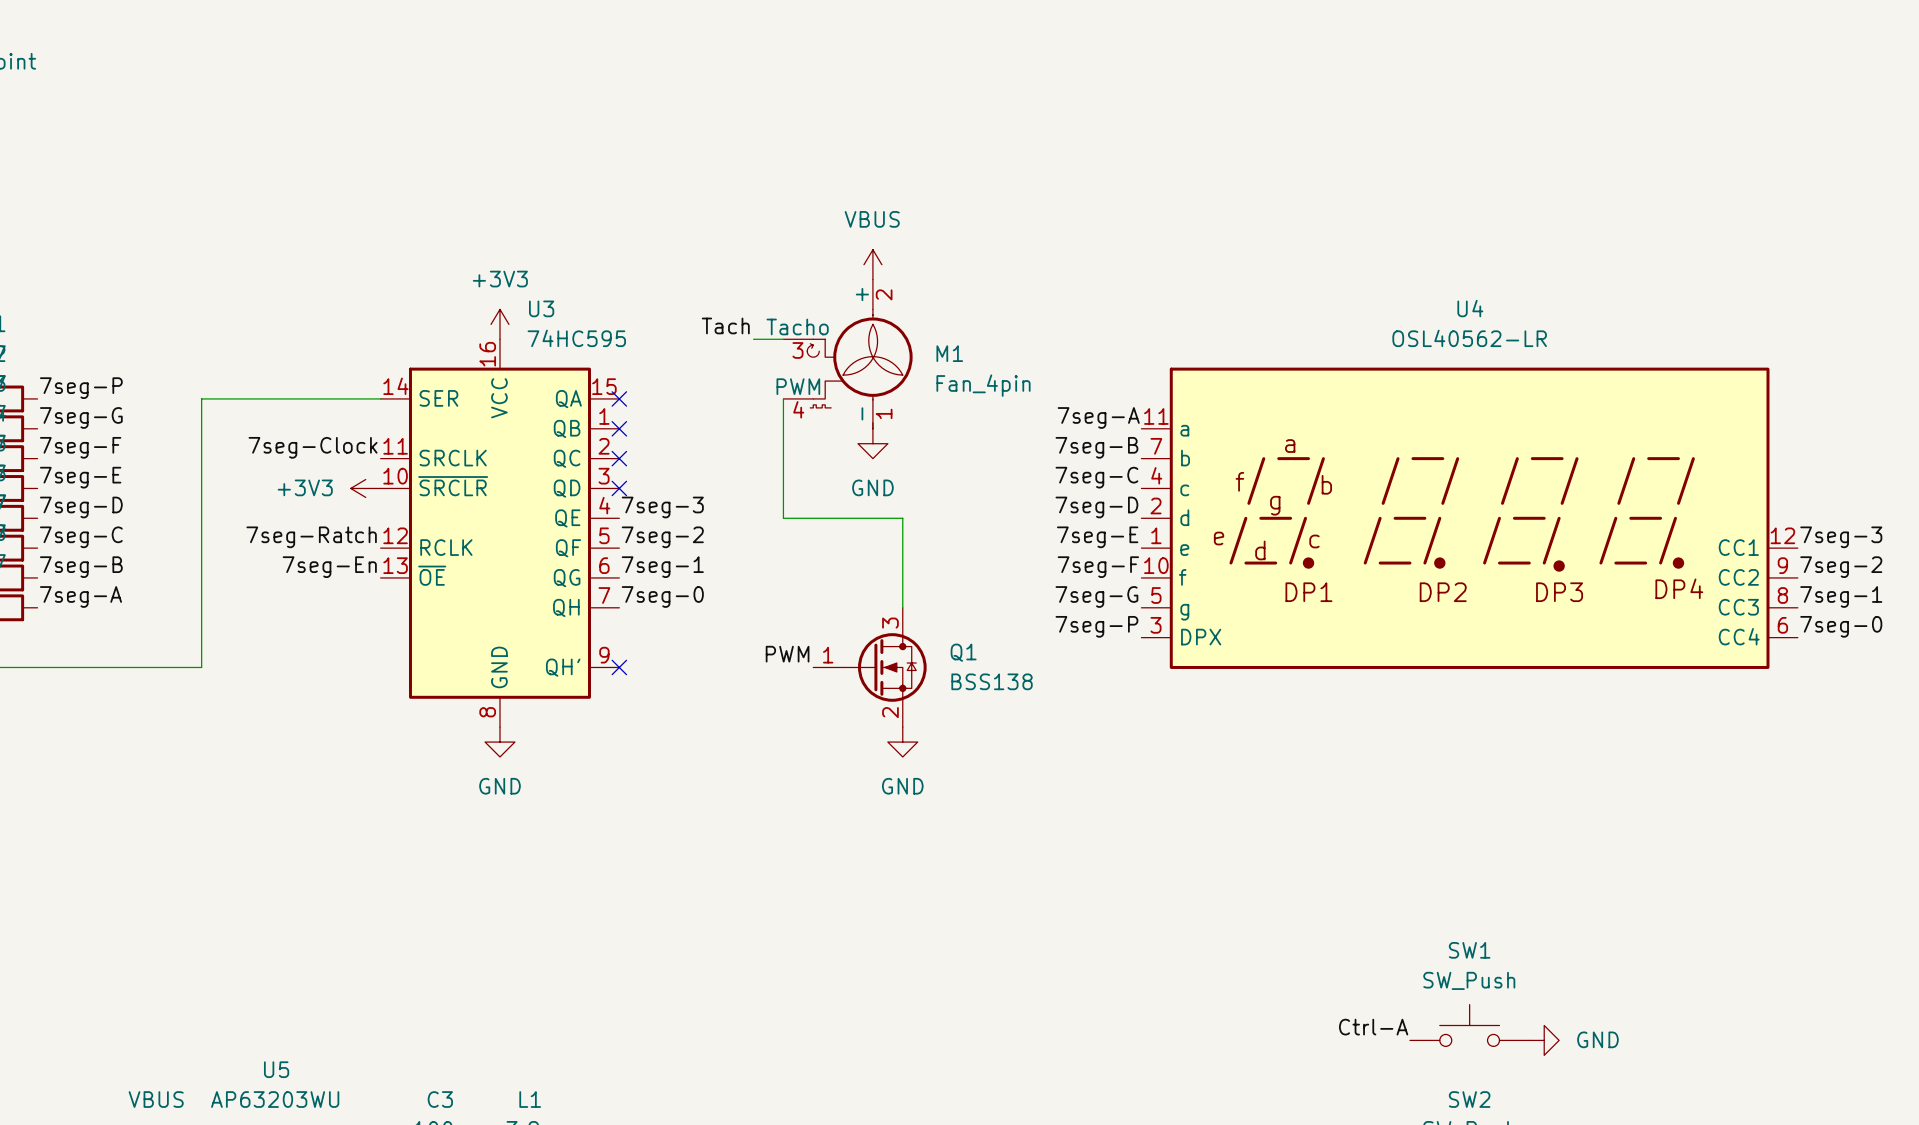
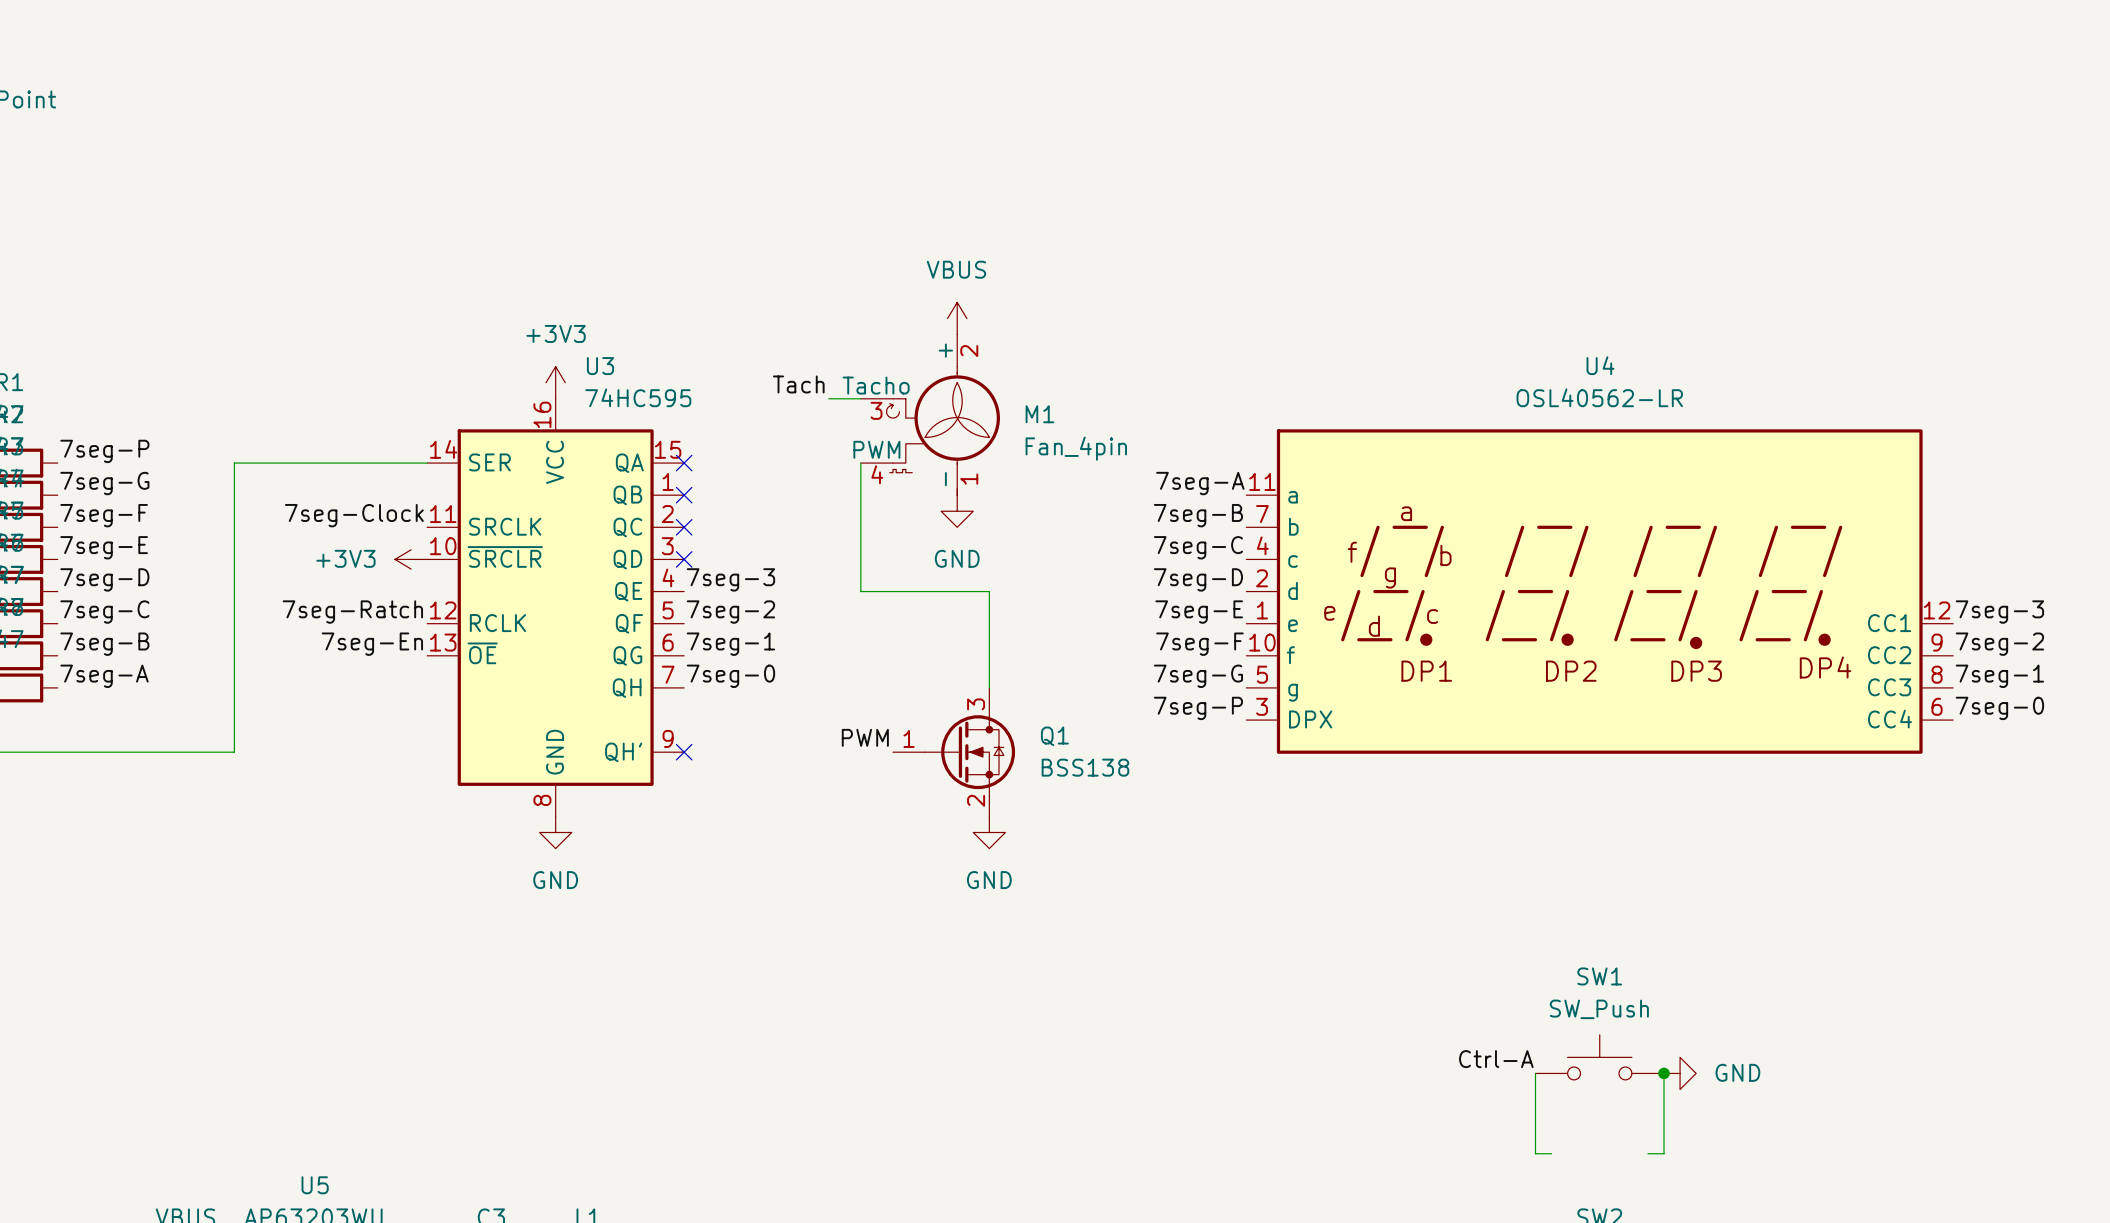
wire: none -> (1535, 1073) (1535, 1153) (1551, 1153)
wire: none -> (1663, 1073) (1663, 1153) (1647, 1153)
junction: none -> (1663, 1073)
SW1 position: (1469, 1025) -> (1599, 1057)
label position: Ctrl-A (1373, 1027) -> Ctrl-A (1496, 1059)
power symbol position: GND (1544, 1040) -> GND (1680, 1073)

